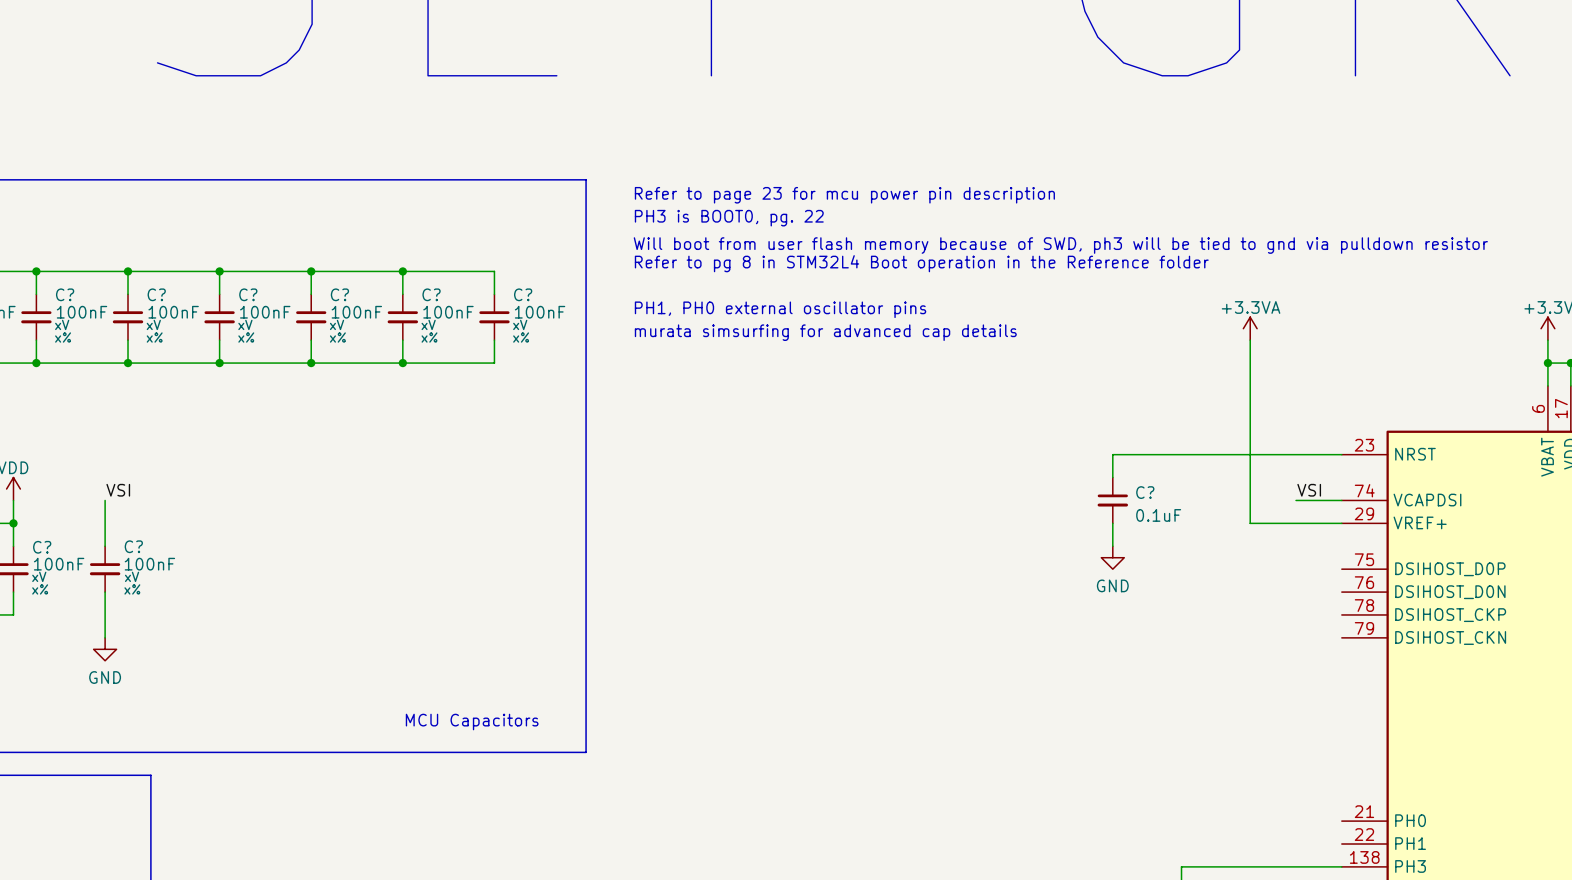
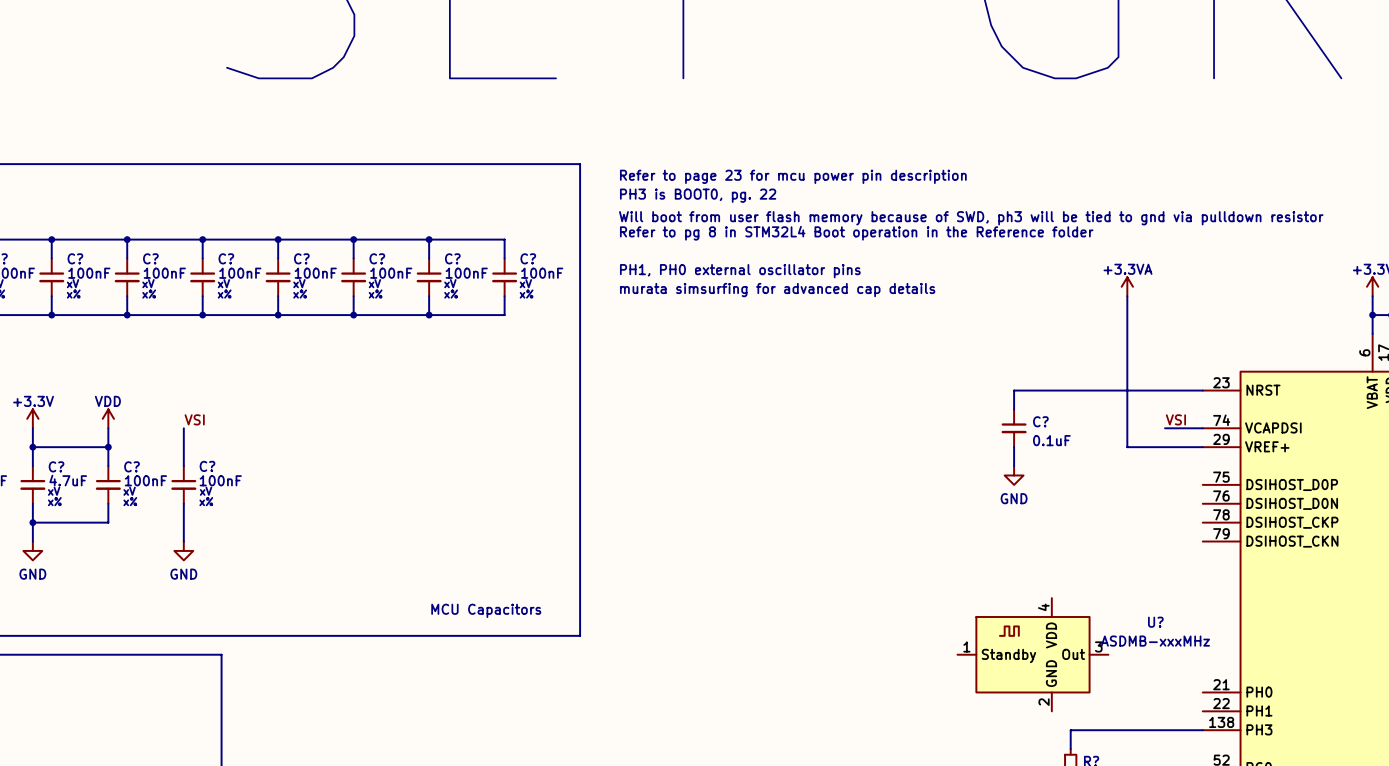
U?: none -> ASDMB-xxxMHz (1032, 654)

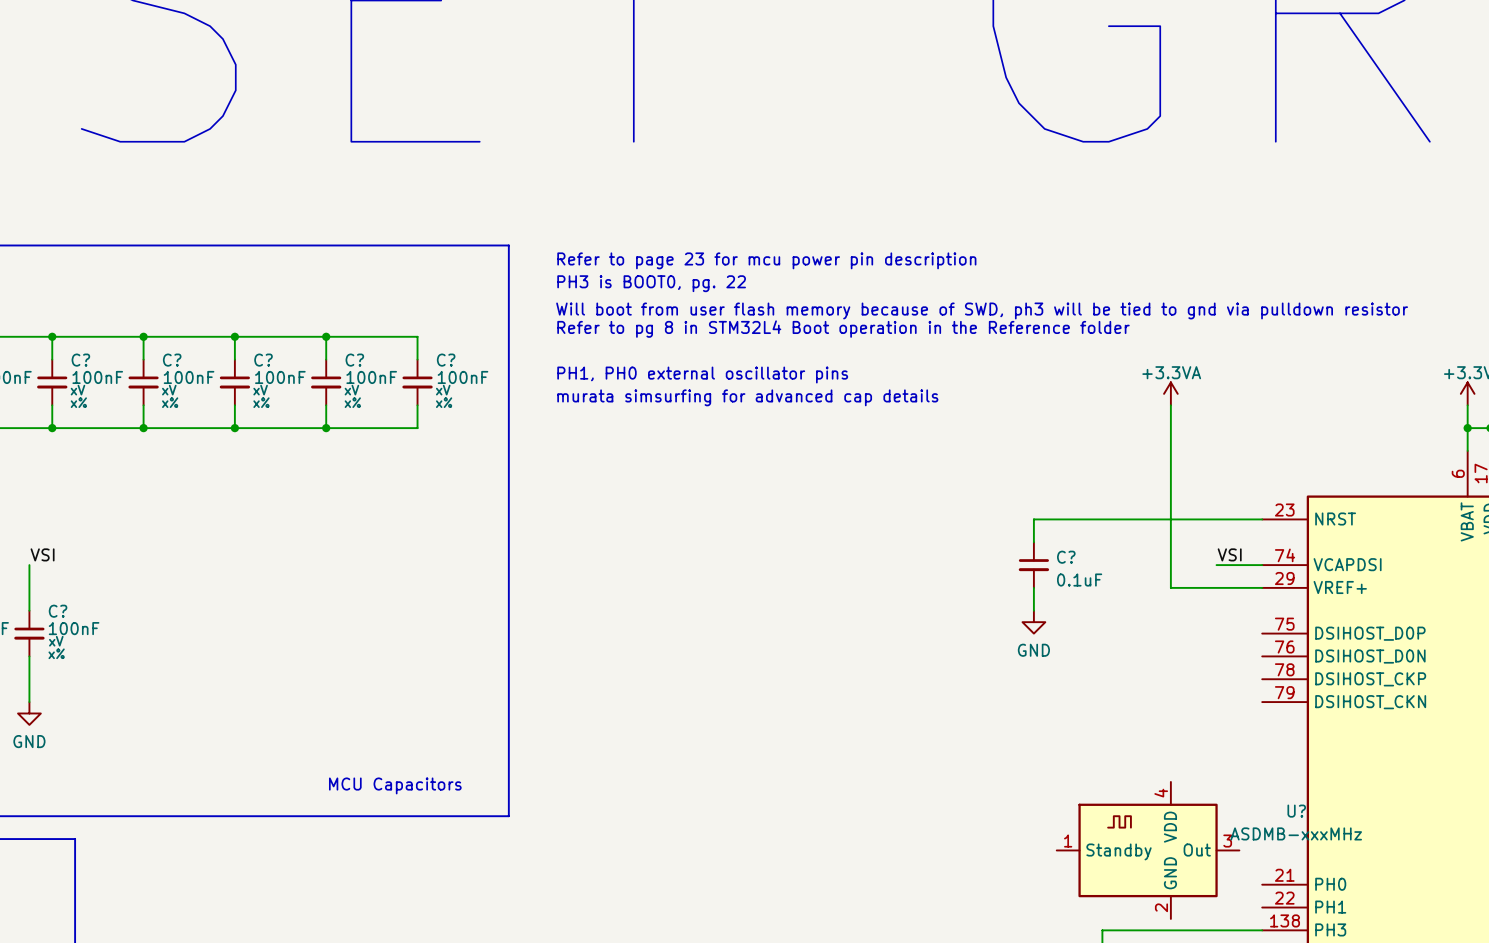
U? position: (1032, 654) -> (1148, 850)

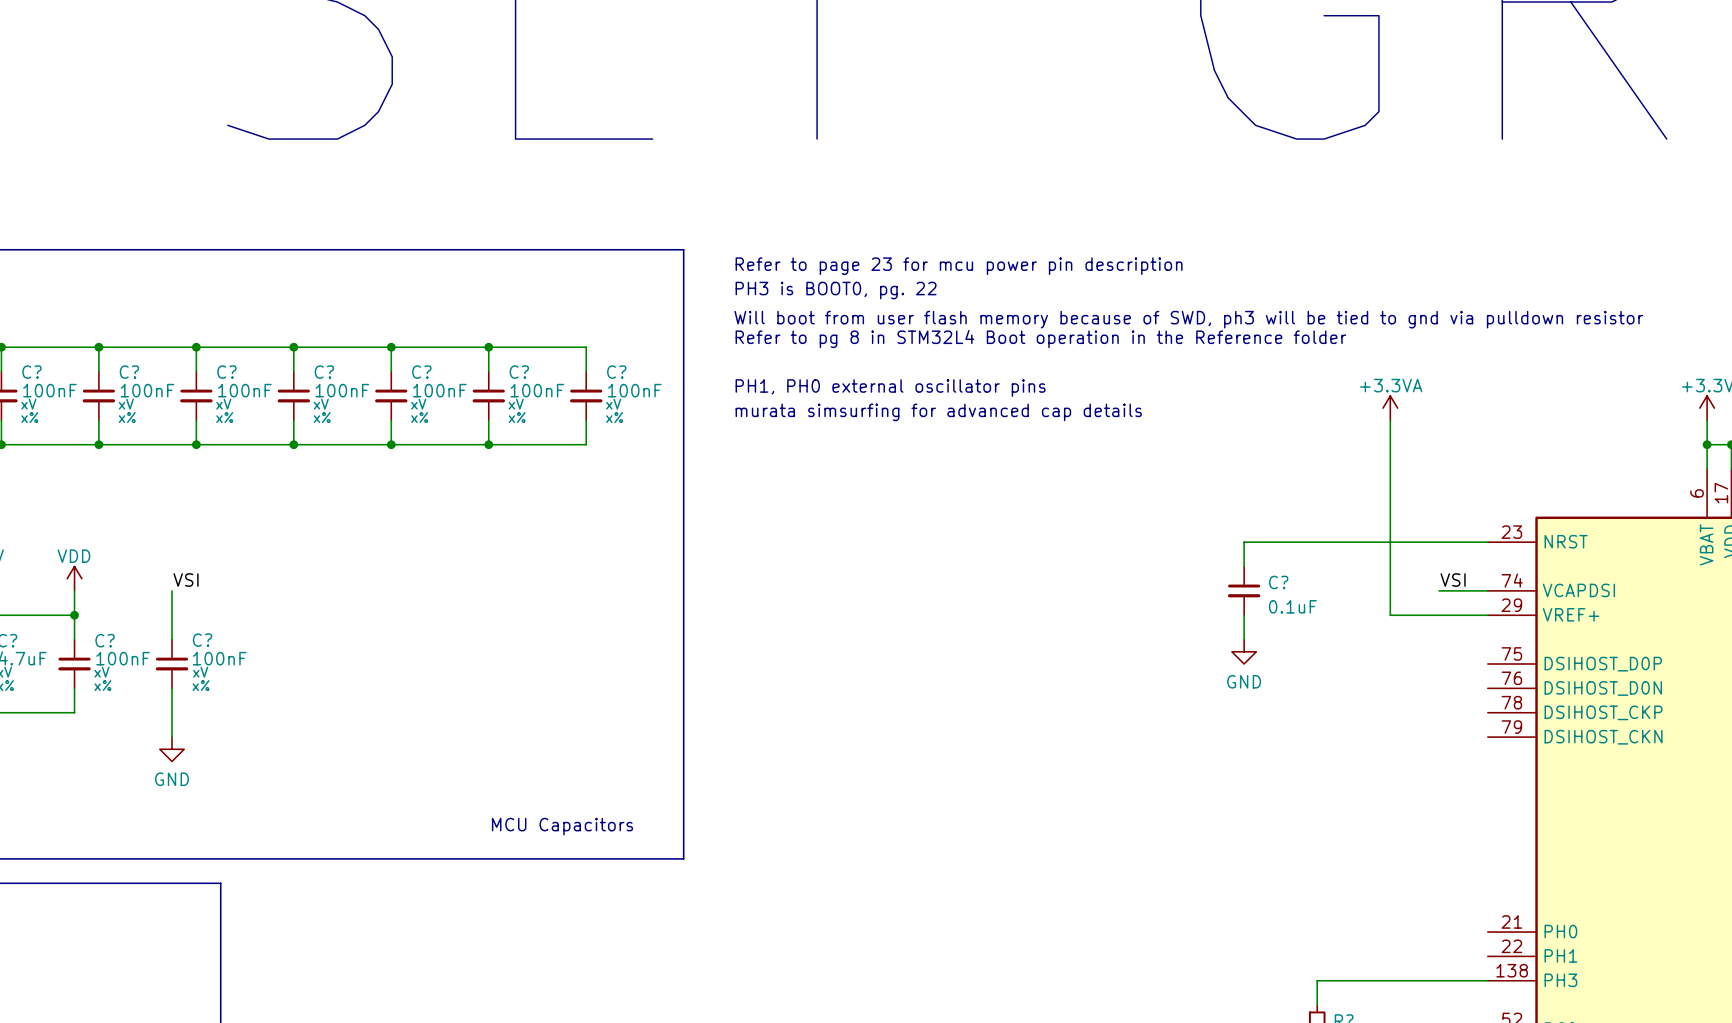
U?: ASDMB-xxxMHz (1148, 850) -> none

